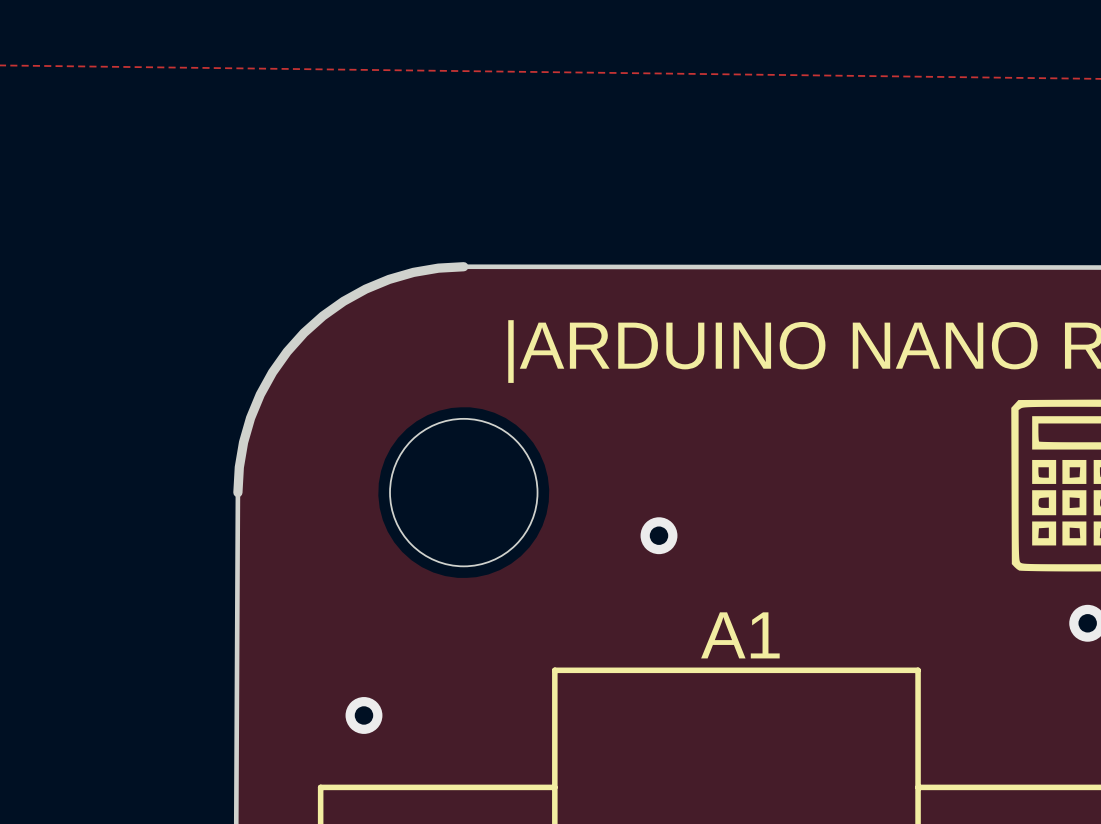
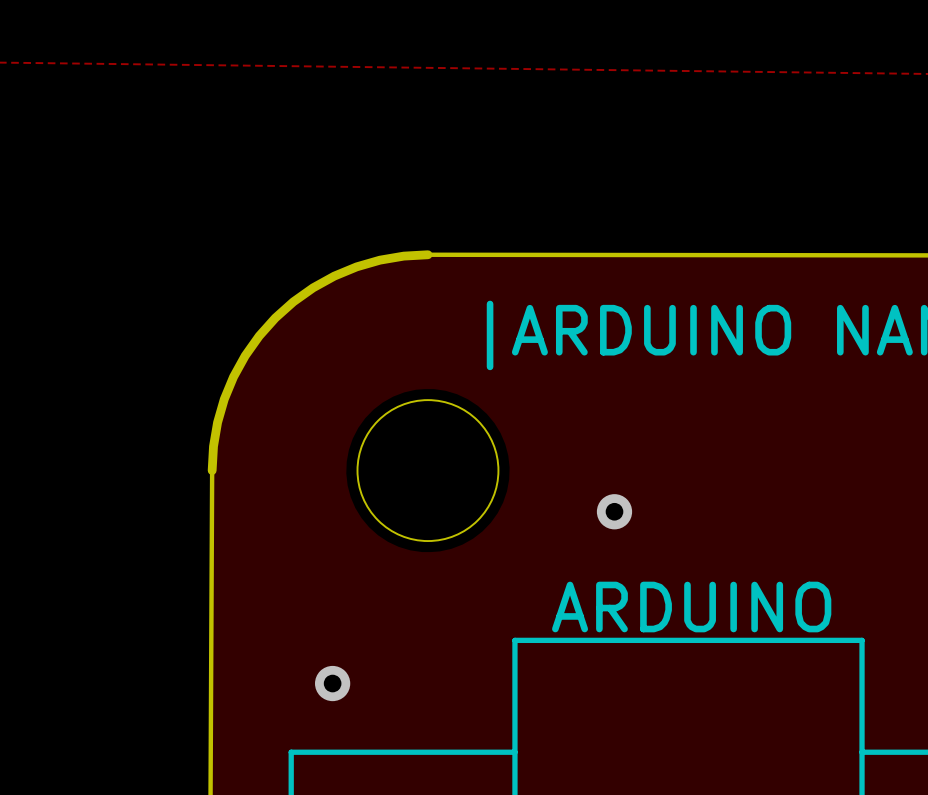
A1 name: A1 (740, 635) -> ARDUINO (691, 607)

